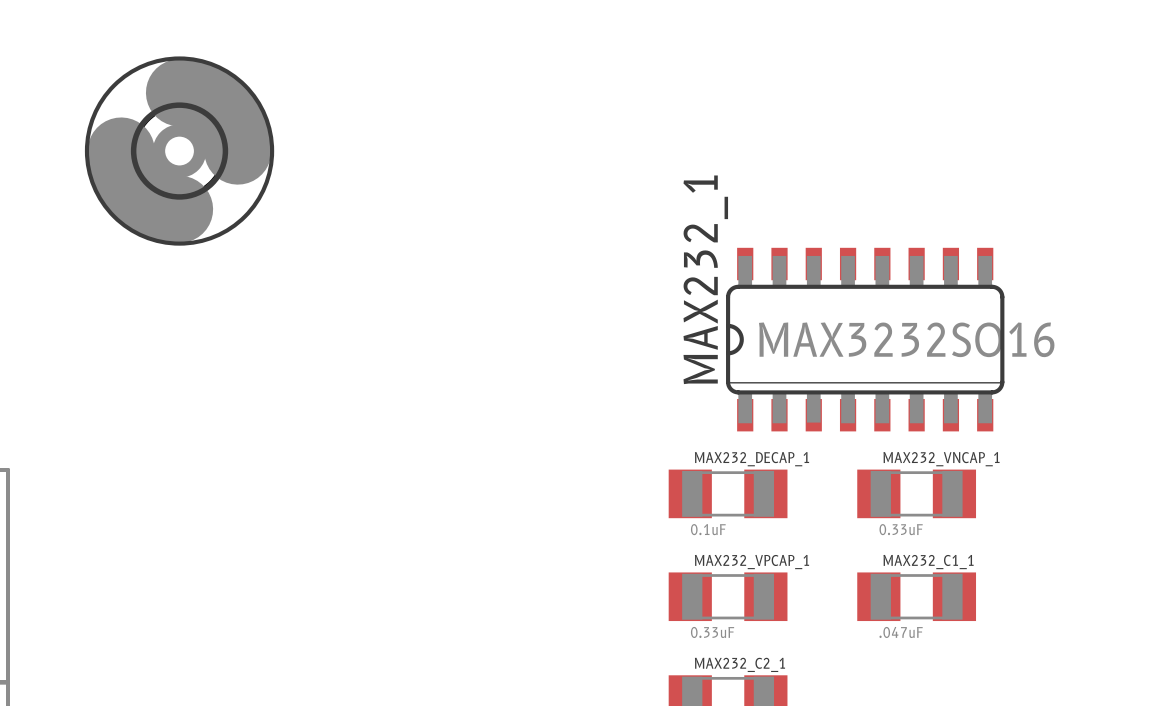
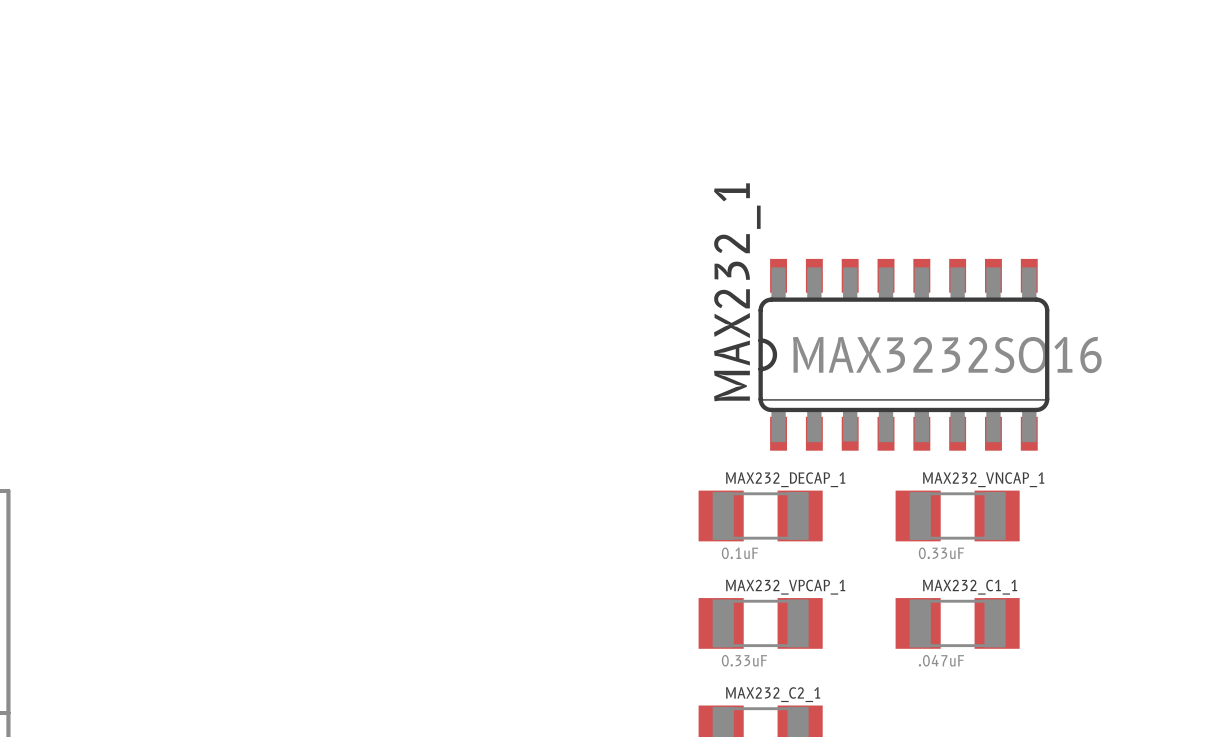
part: (179, 151) -> none

